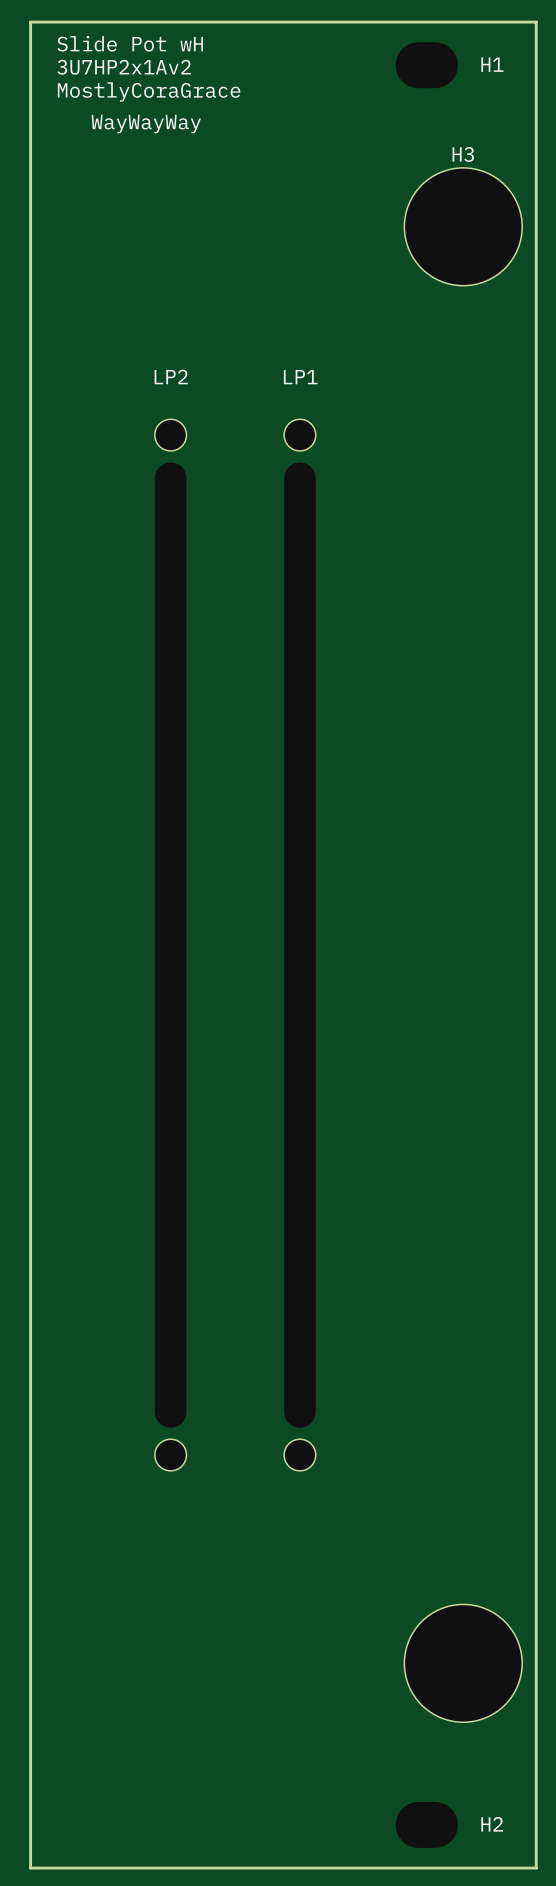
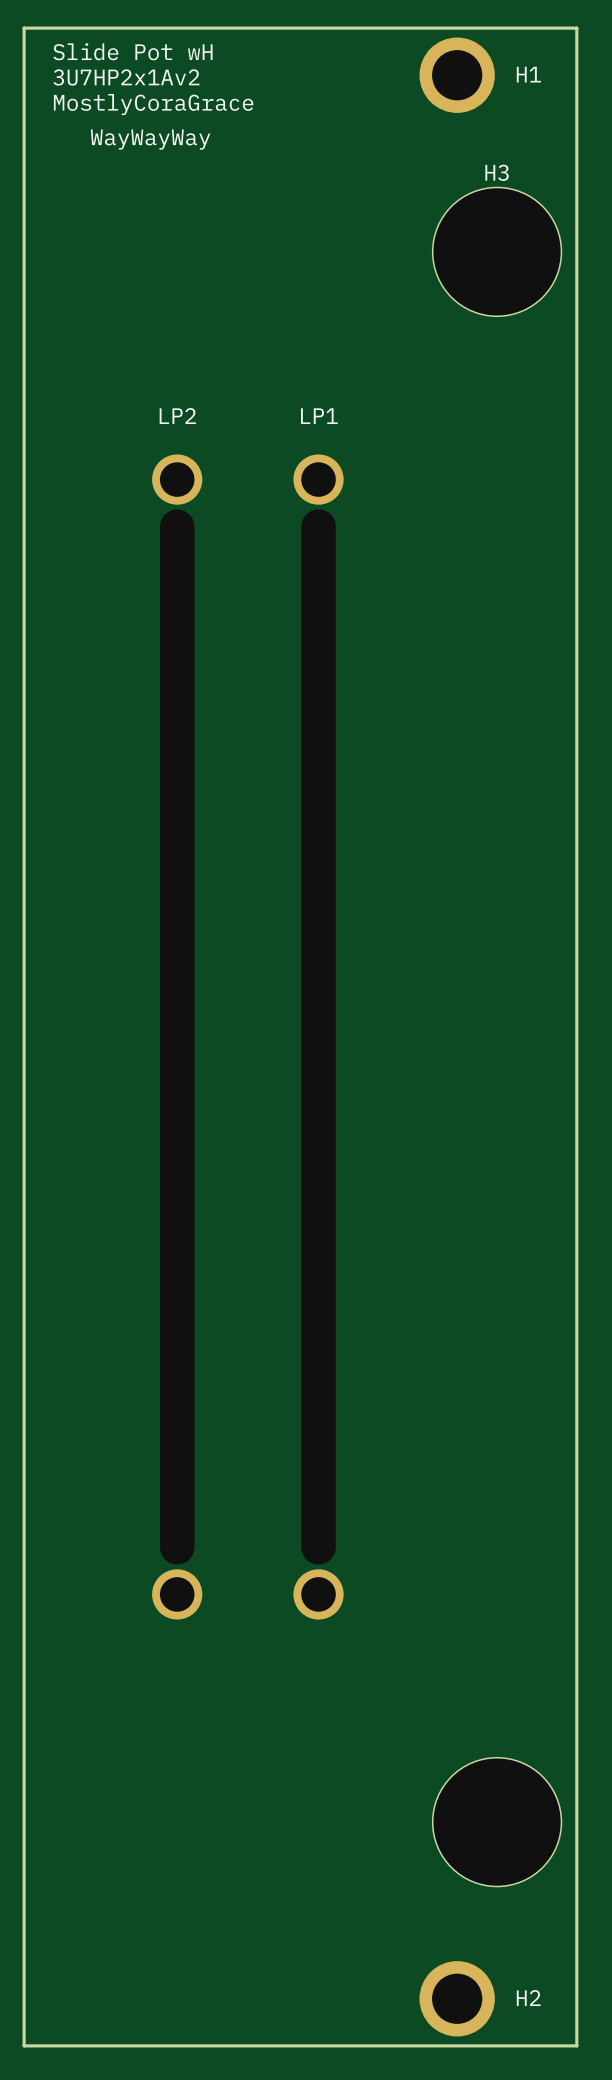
H1 footprint: [395, 42, 458, 89] -> [419, 37, 495, 113]
LP2 footprint: [154, 419, 187, 1471] -> [152, 454, 203, 1620]
LP1 footprint: [284, 419, 316, 1471] -> [293, 454, 344, 1620]
H2 footprint: [395, 1801, 458, 1848] -> [419, 1961, 495, 2037]

